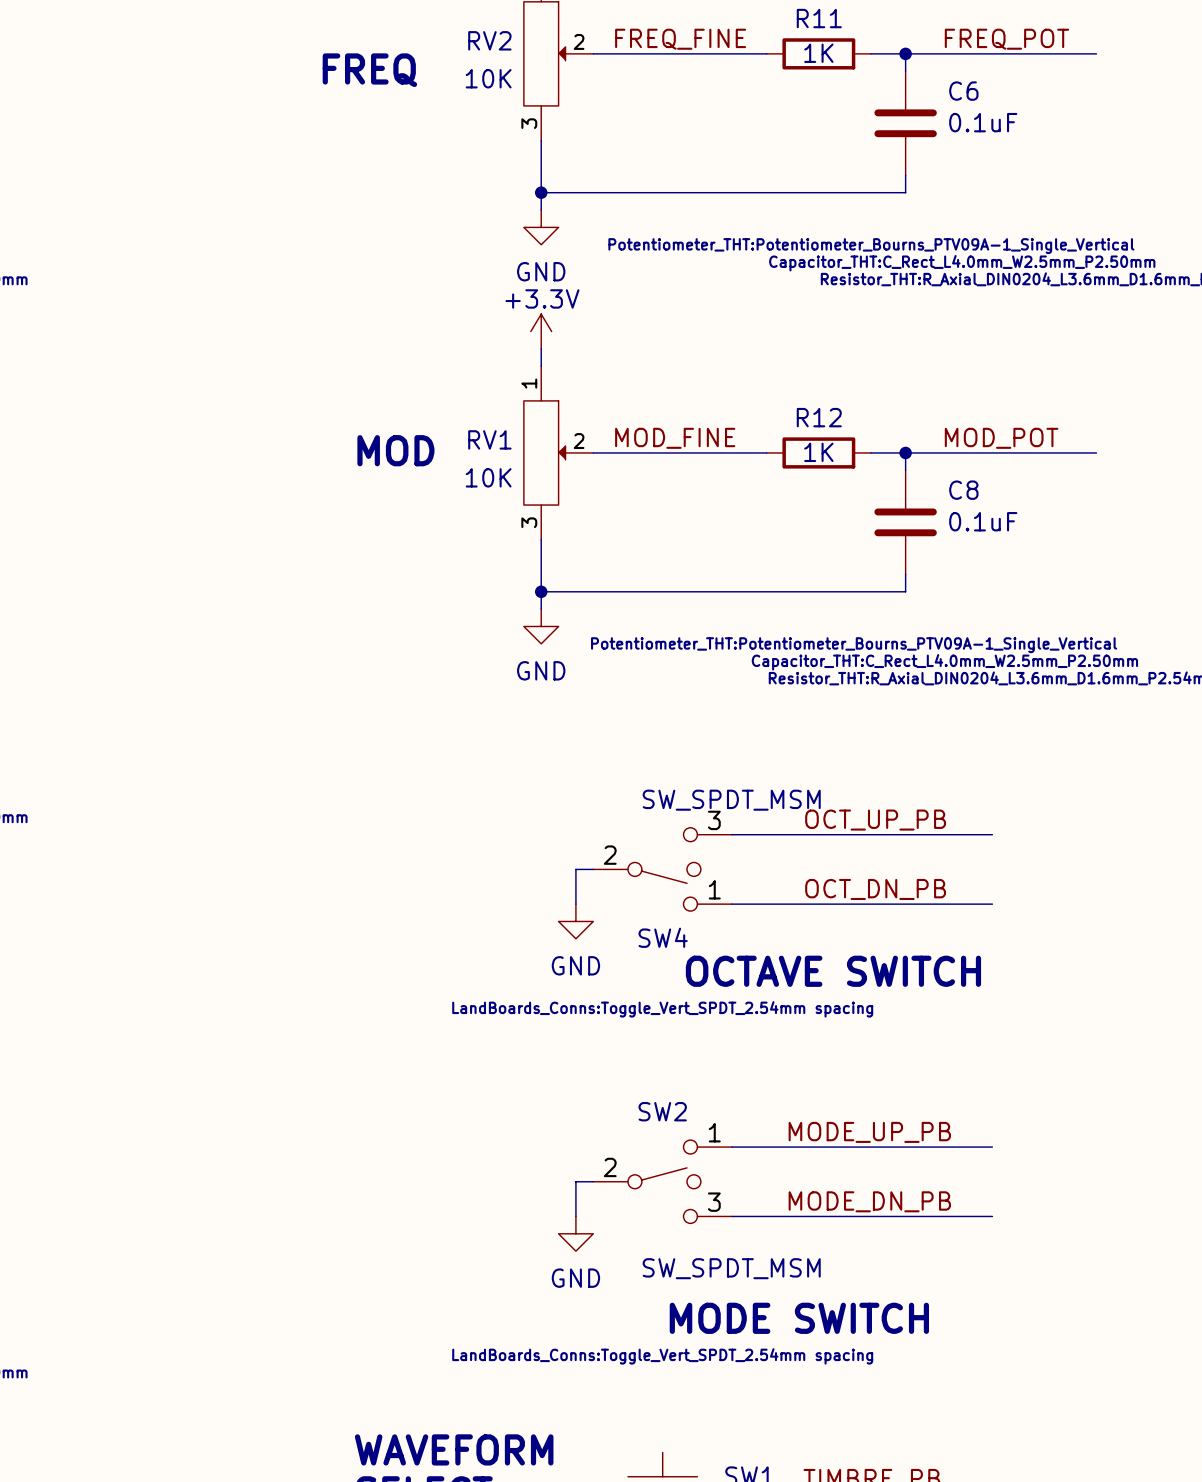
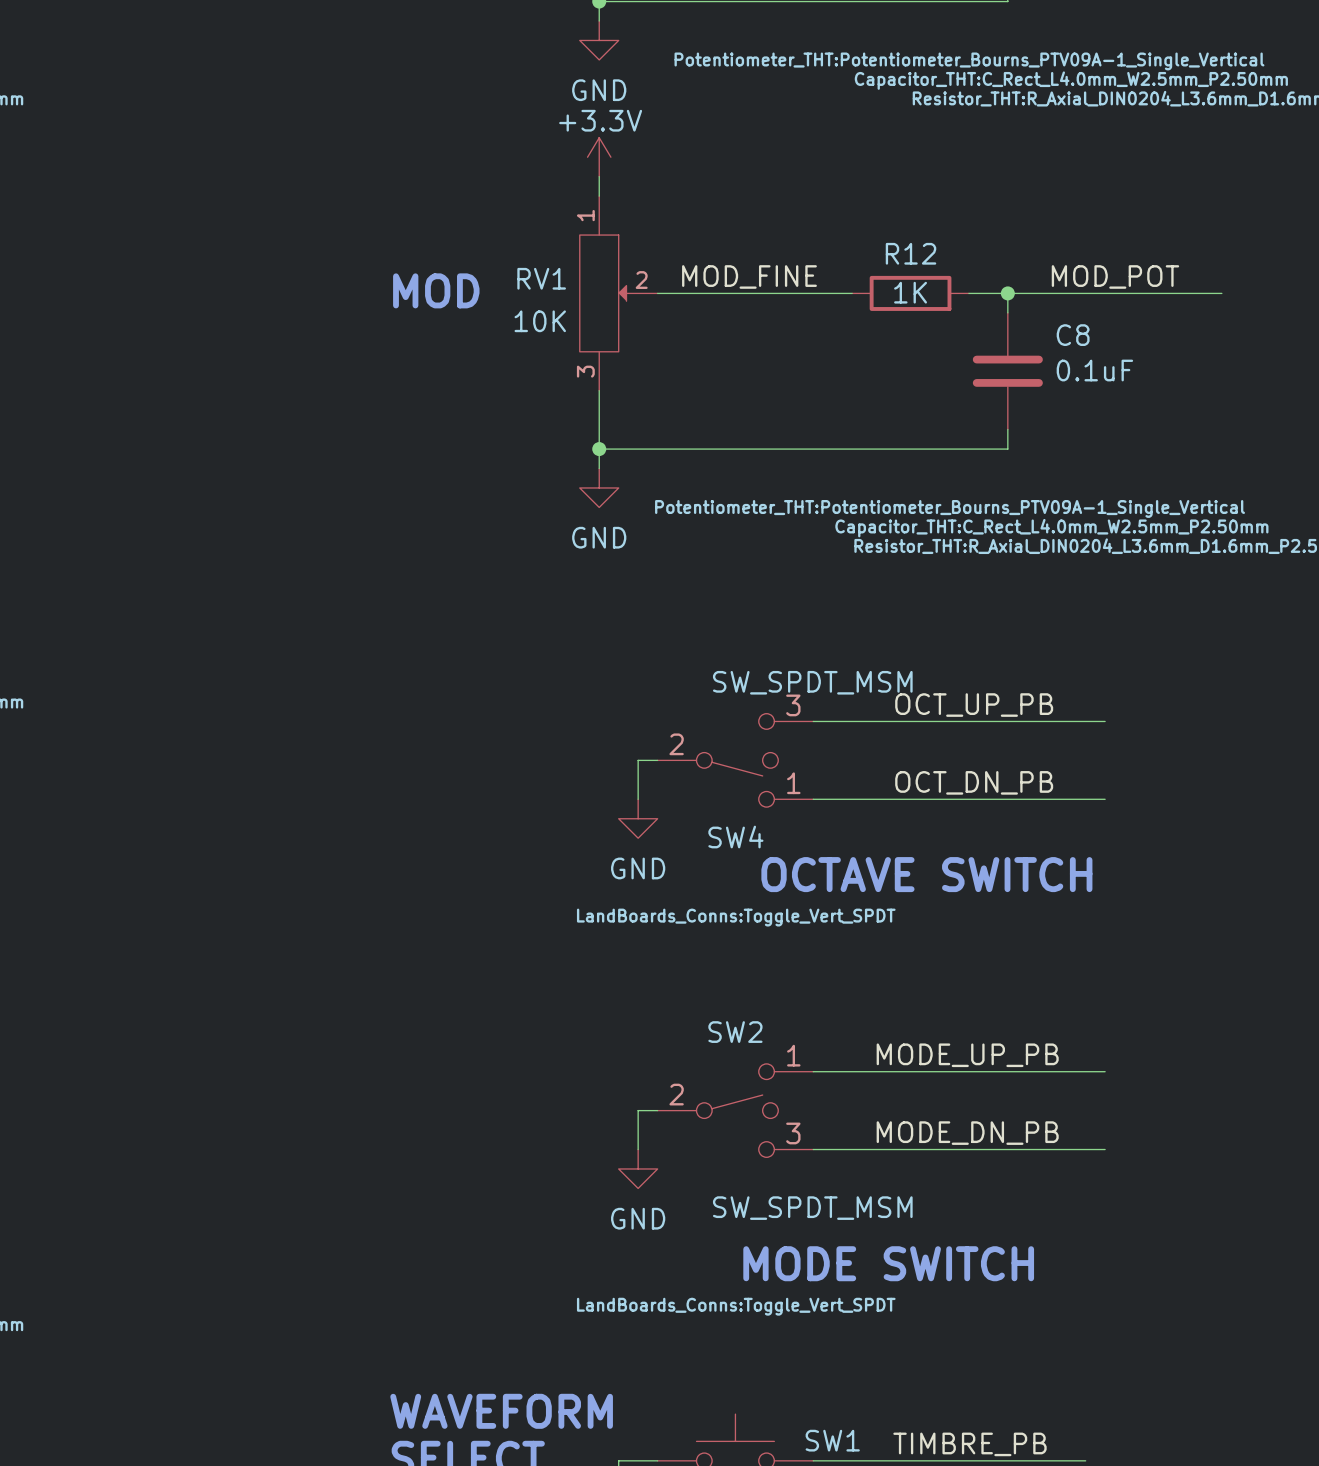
SW4 text: LandBoards_Conns:Toggle_Vert_SPDT_2.54mm spacing (662, 1009) -> LandBoards_Conns:Toggle_Vert_SPDT (736, 917)
SW2 text: LandBoards_Conns:Toggle_Vert_SPDT_2.54mm spacing (662, 1356) -> LandBoards_Conns:Toggle_Vert_SPDT (736, 1306)

